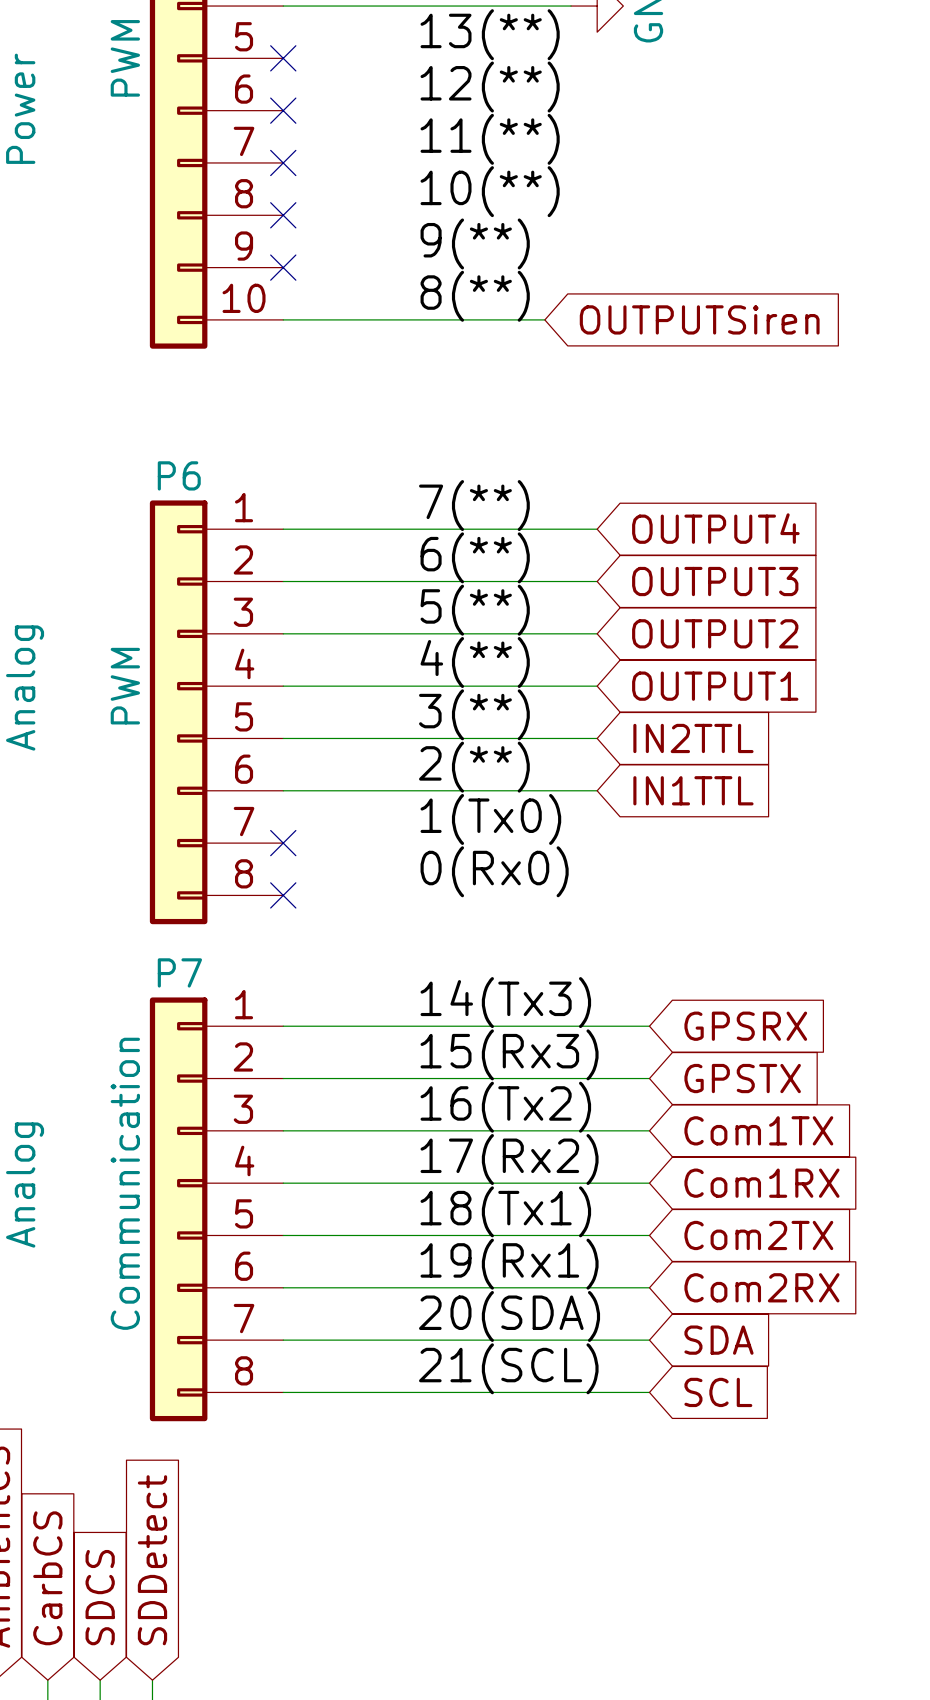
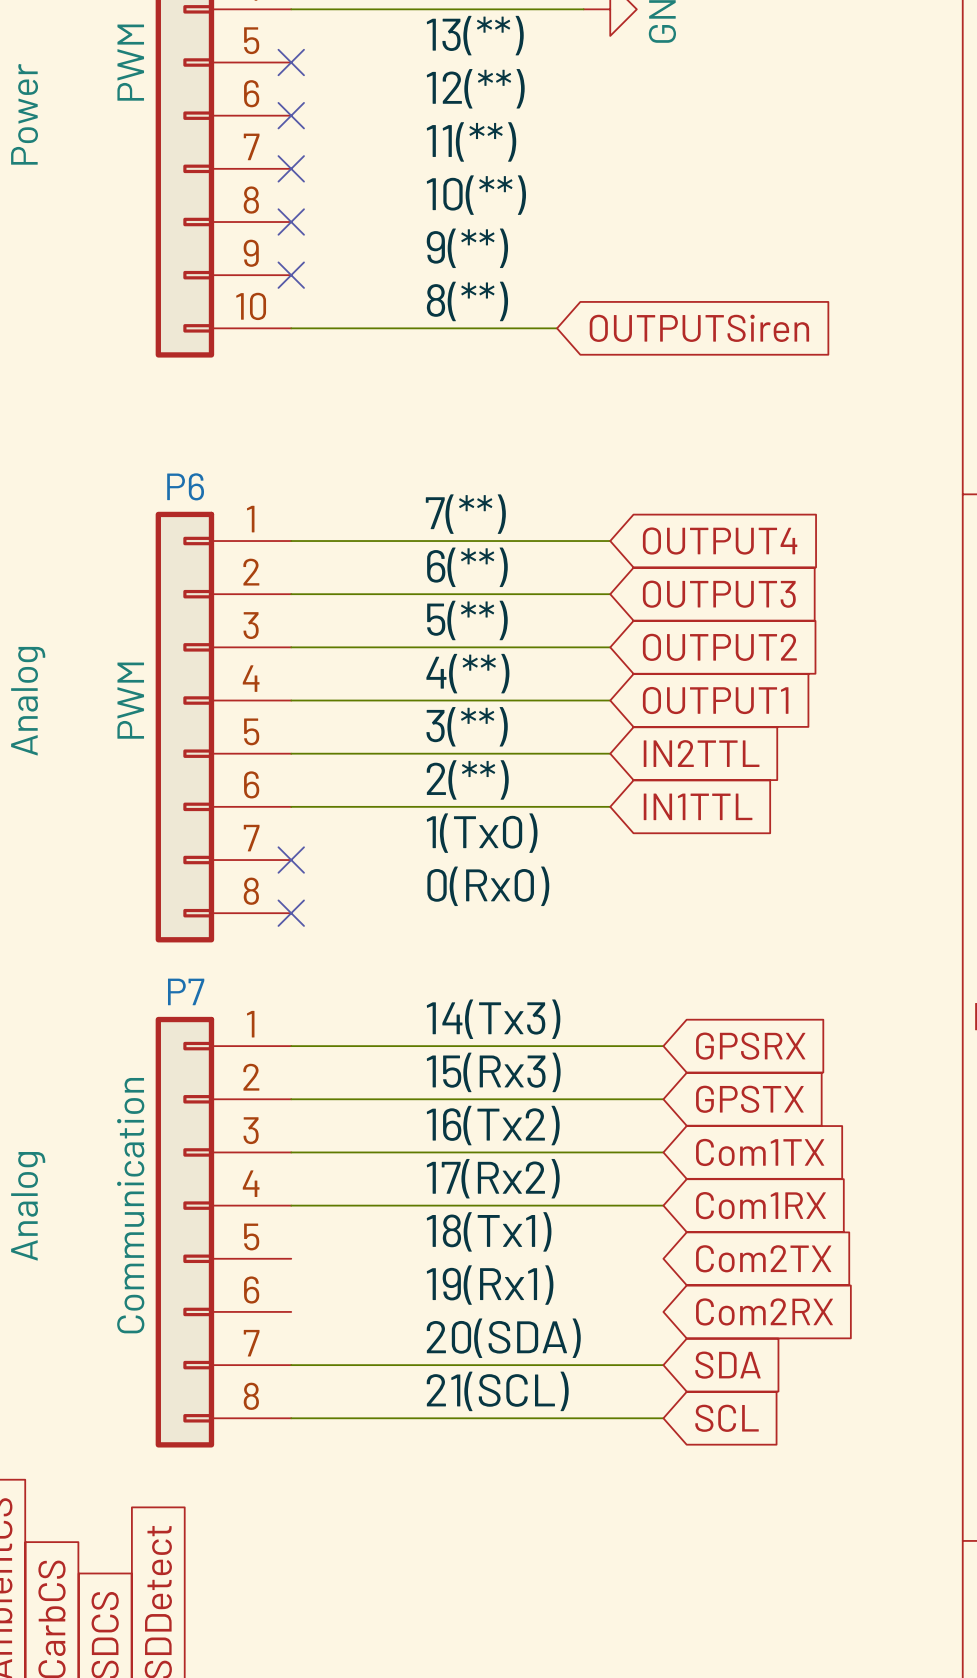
wire: (283, 1235) (649, 1235) -> none
wire: (283, 1287) (649, 1287) -> none

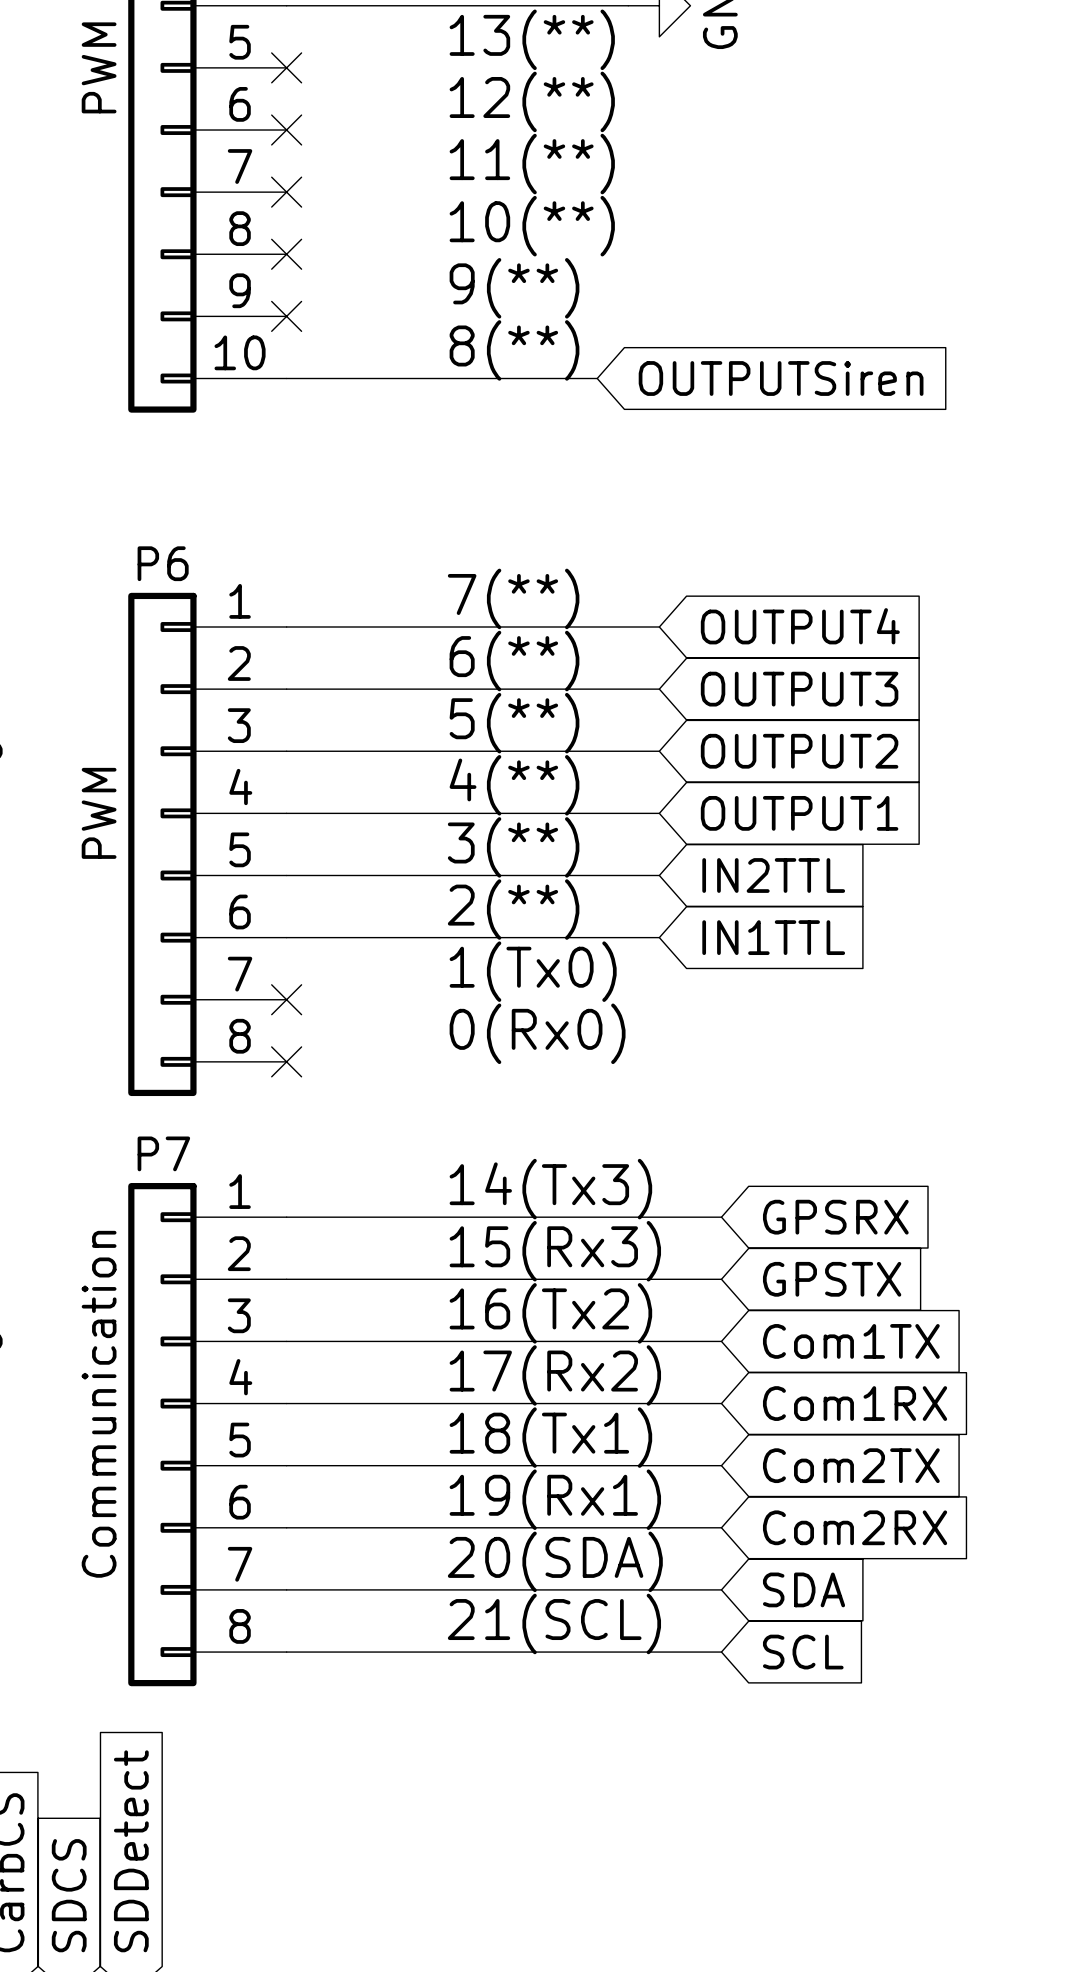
wire: none -> (286, 1465) (721, 1465)
wire: none -> (286, 1527) (721, 1527)

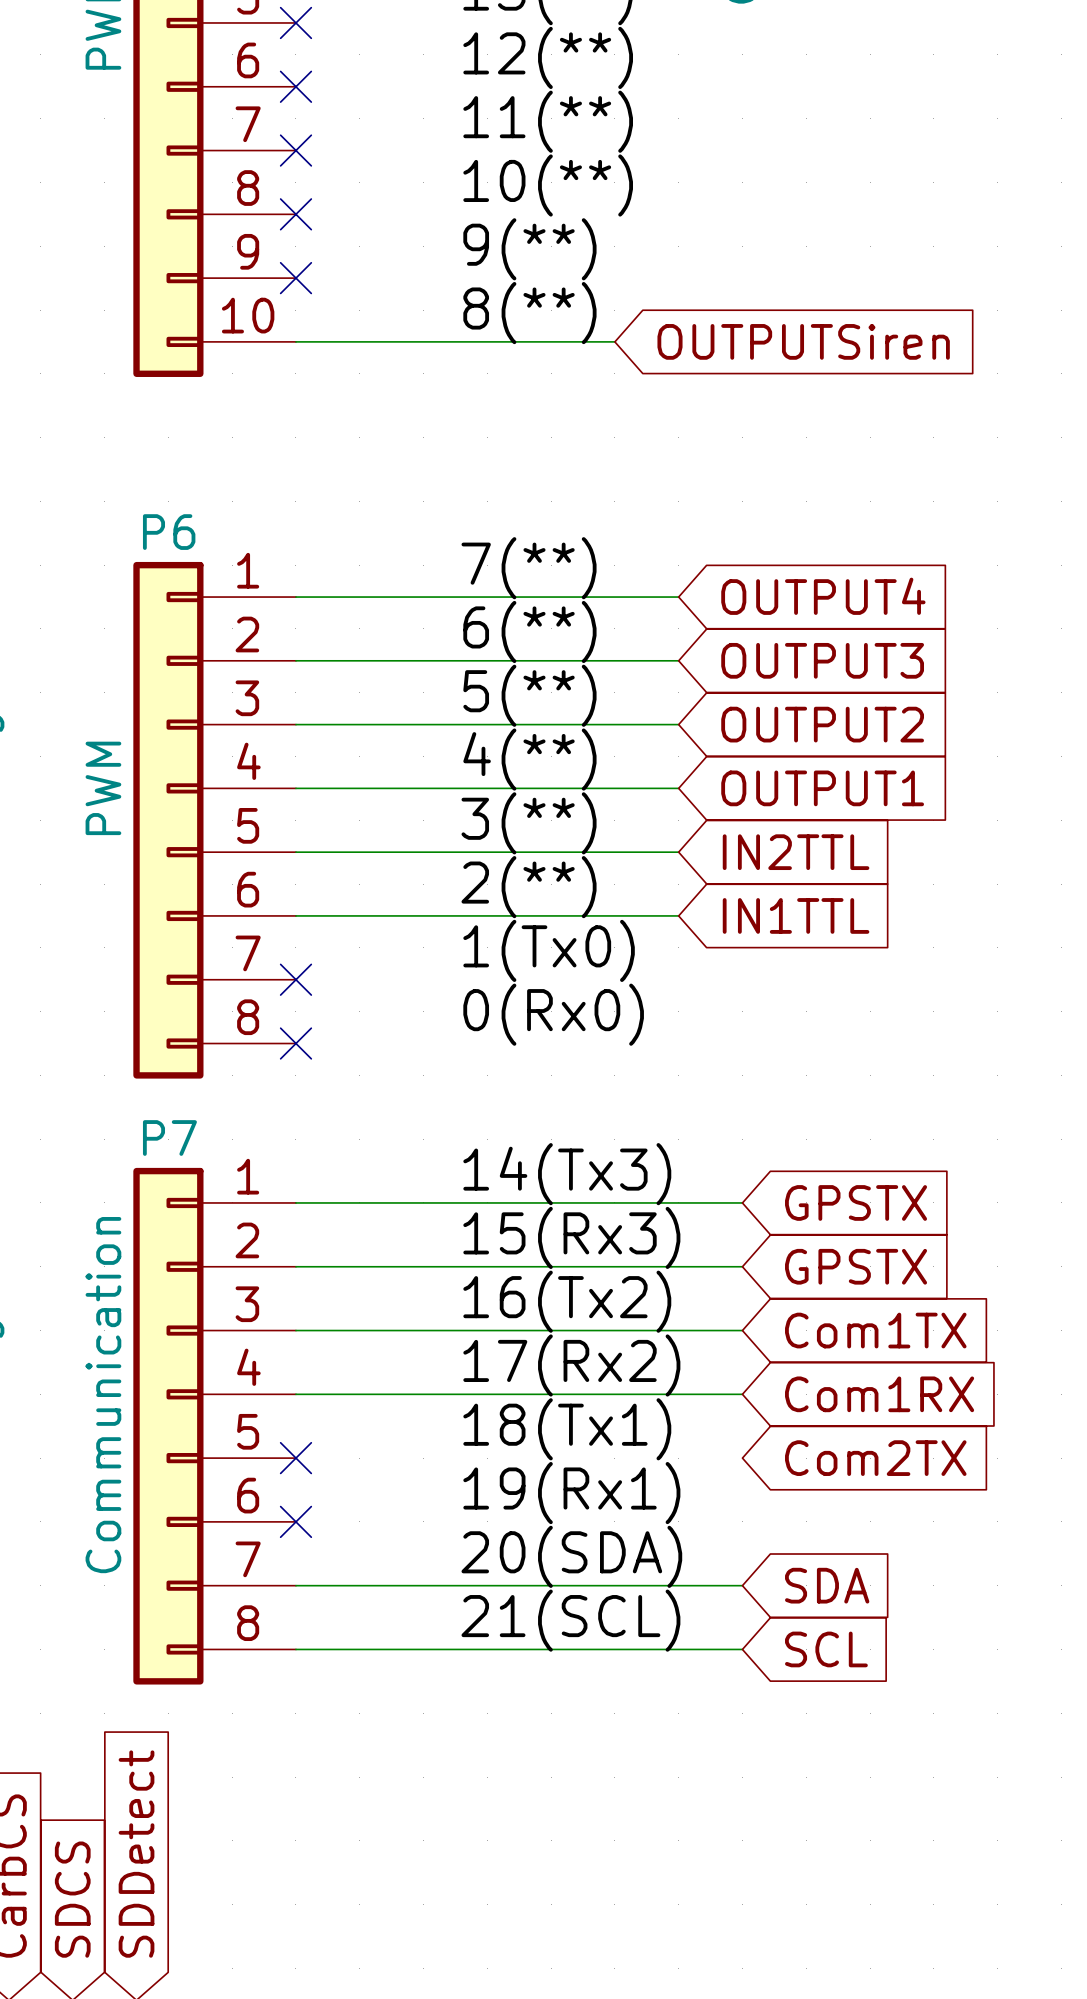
global label: GPSRX (835, 1217) -> GPSTX (856, 1202)
wire: (286, 1465) (721, 1465) -> none
no-connect mark: none -> (295, 1458)
wire: (286, 1527) (721, 1527) -> none
no-connect mark: none -> (295, 1521)
global label: Com2RX (855, 1527) -> none

